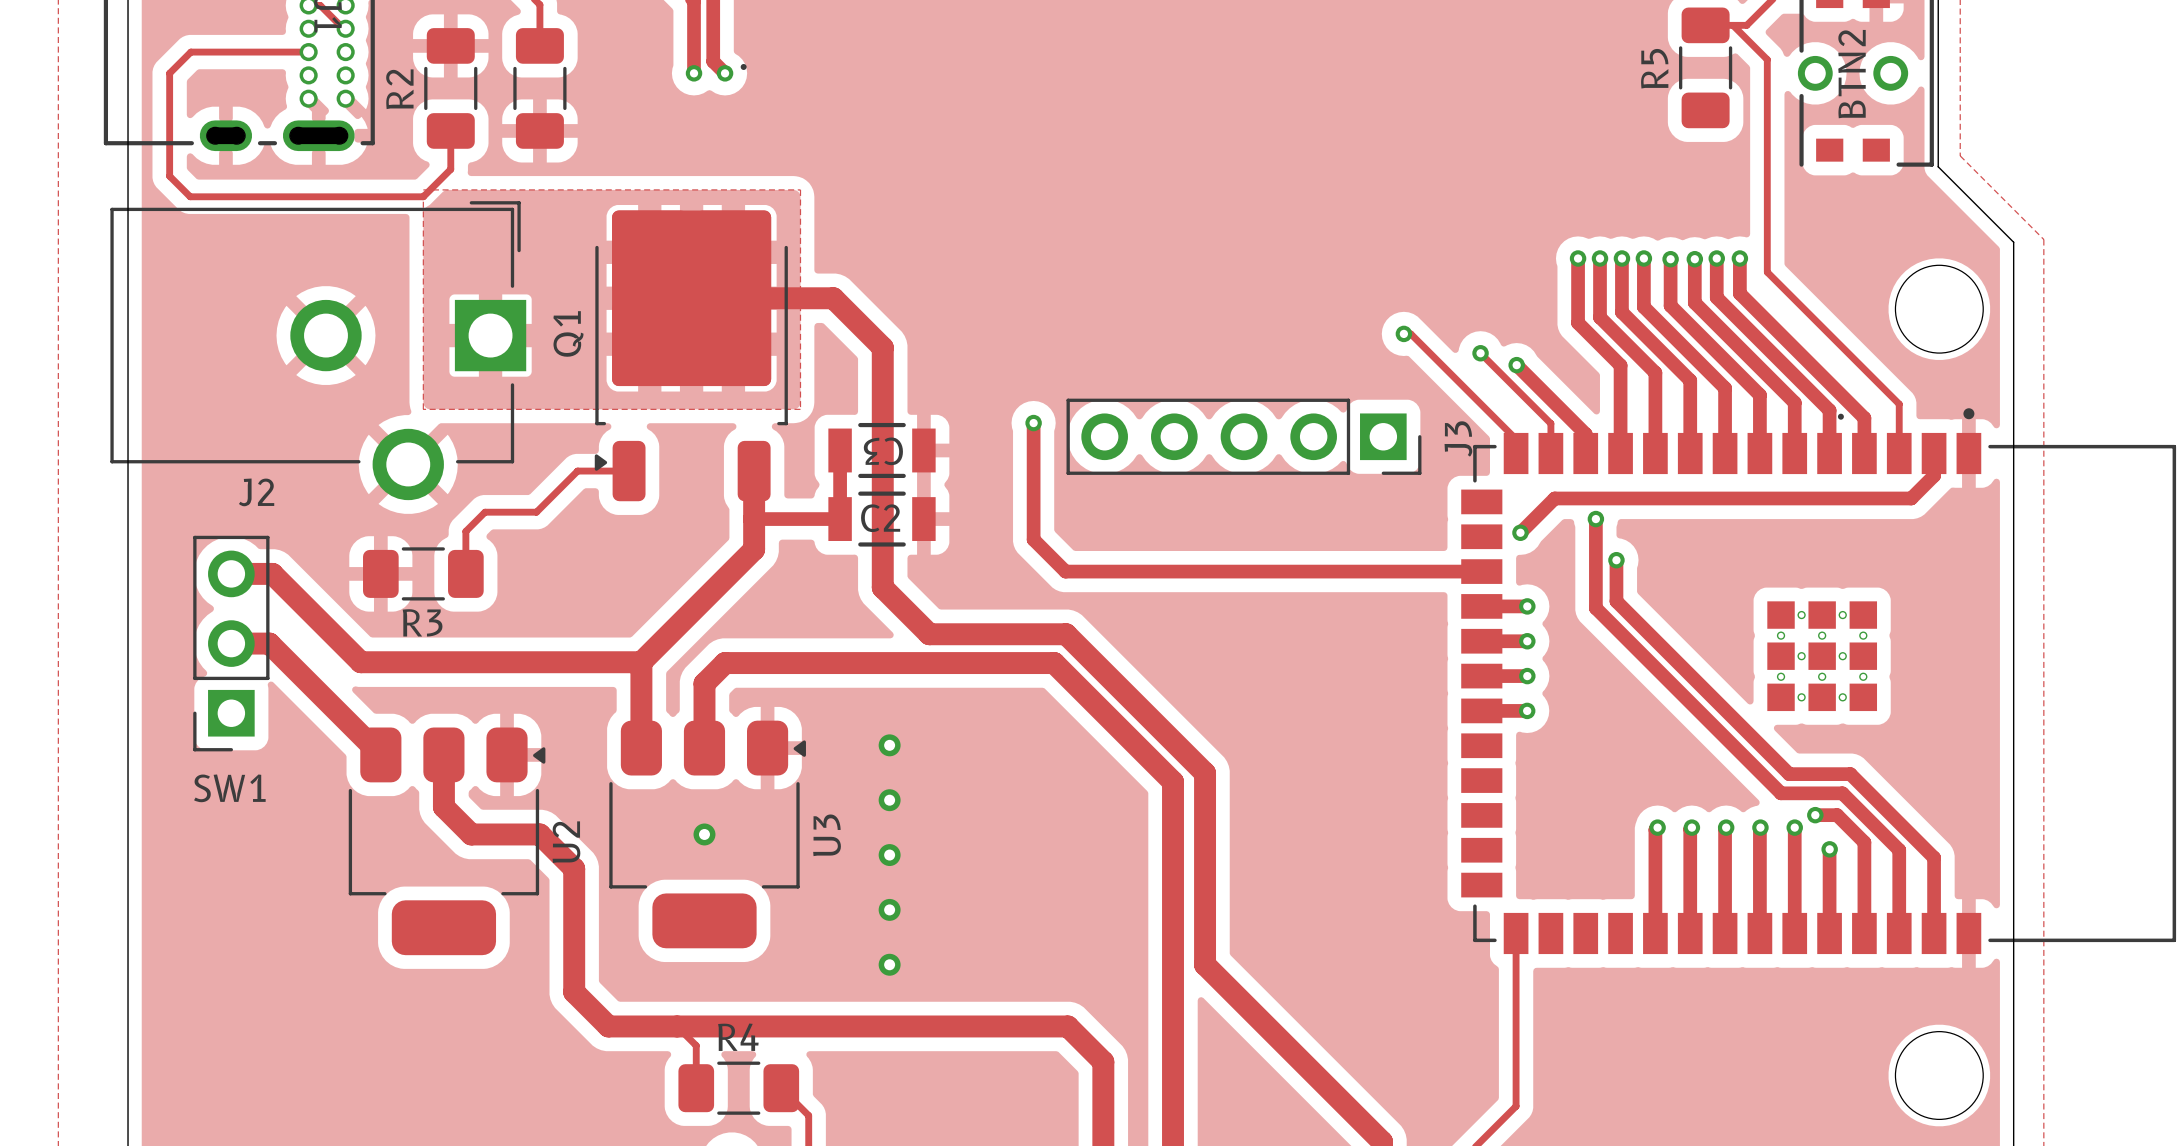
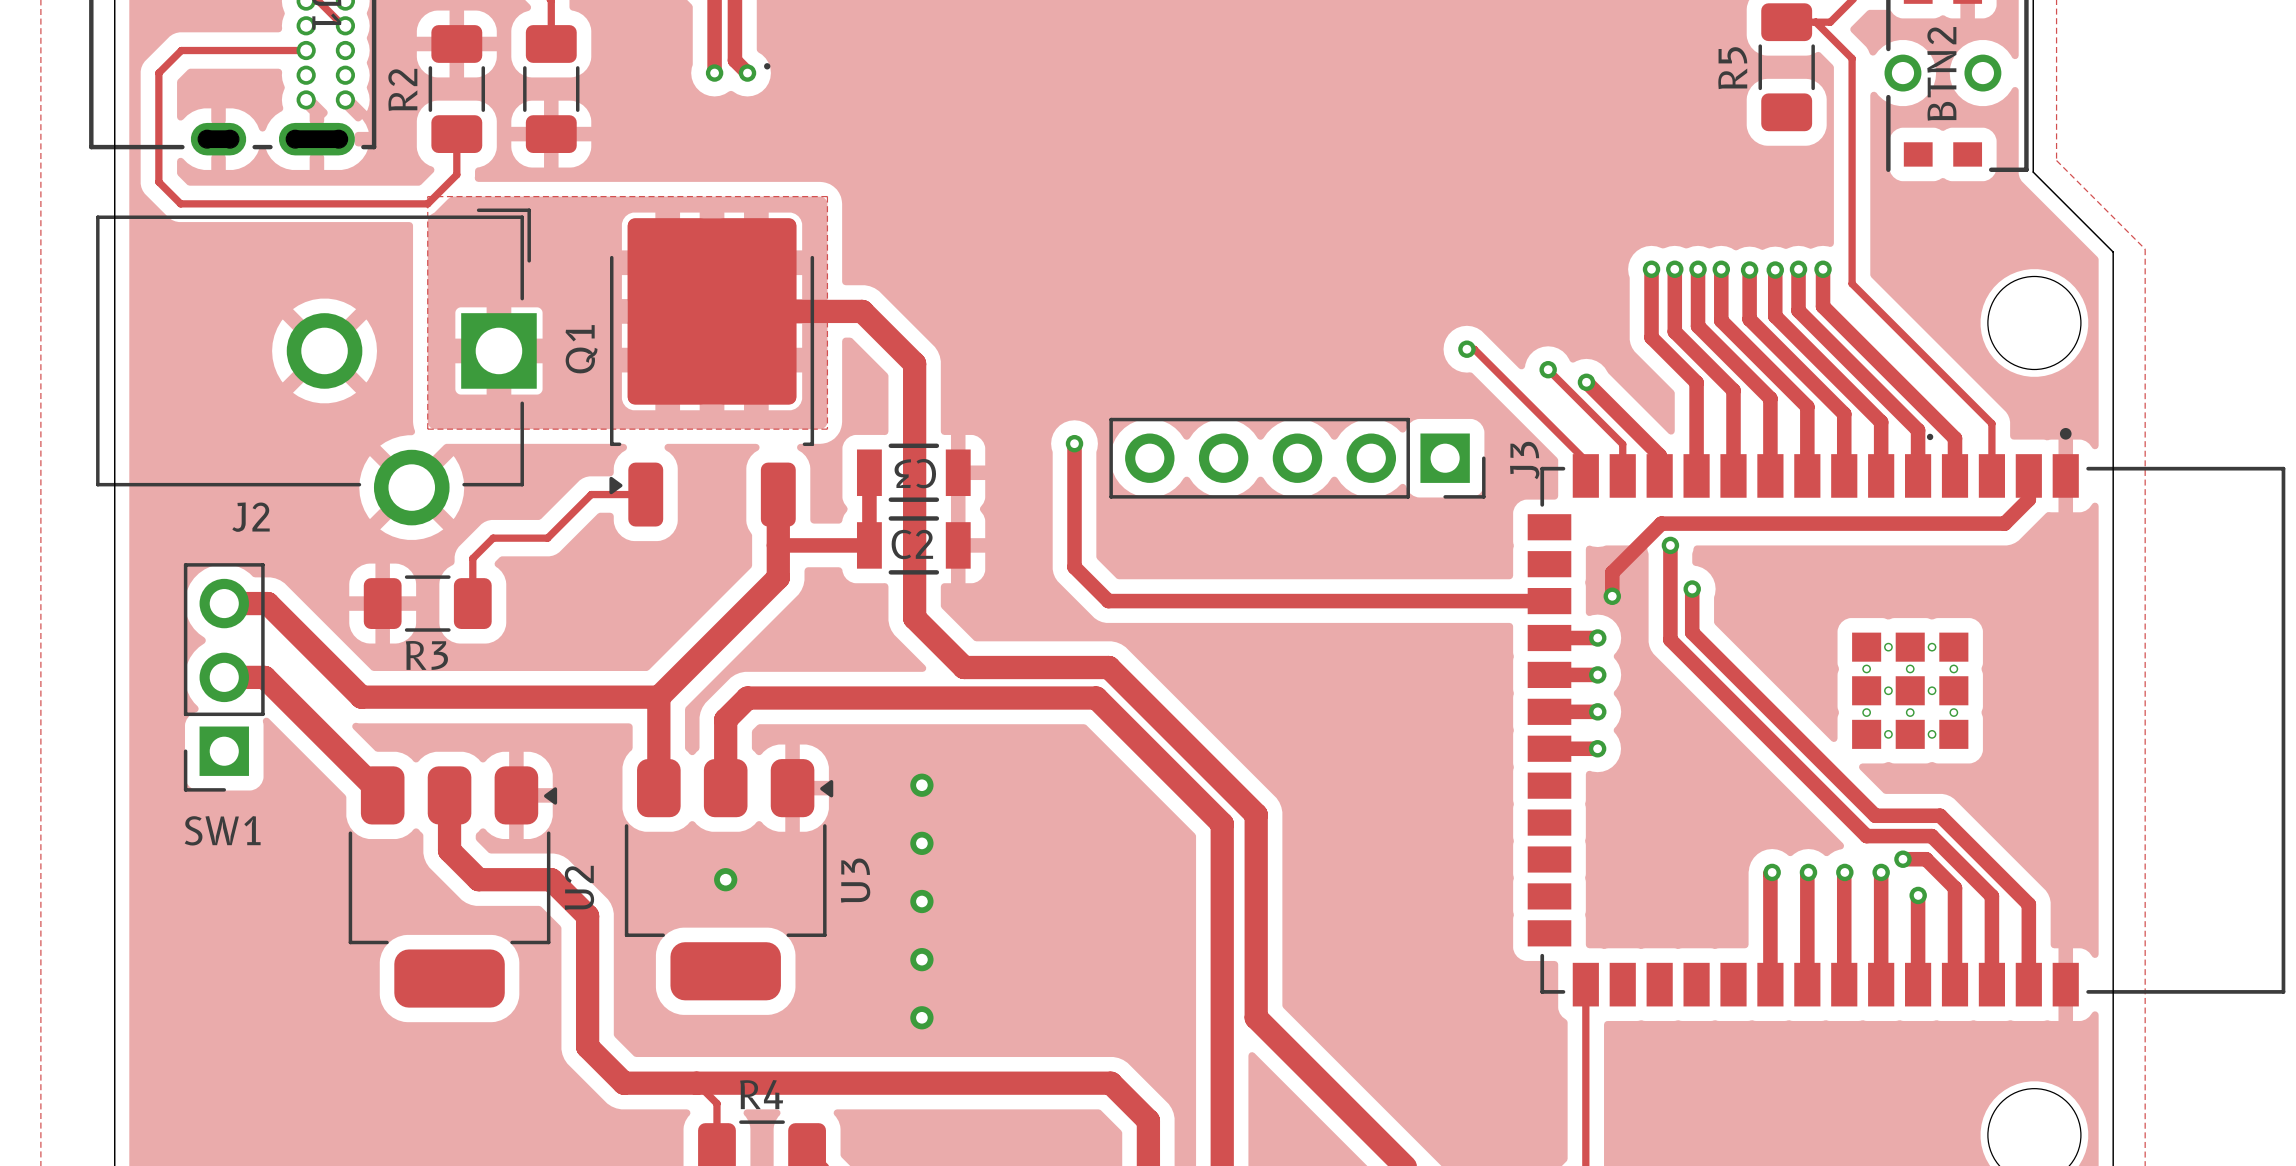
track: (1587, 498) (1554, 498) (1520, 532) -> (1661, 523) (1612, 572) (1612, 596)
via position: (1520, 532) -> (1612, 596)
track: (1657, 827) (1655, 829) (1655, 933) -> none
via: (1657, 827) -> none

